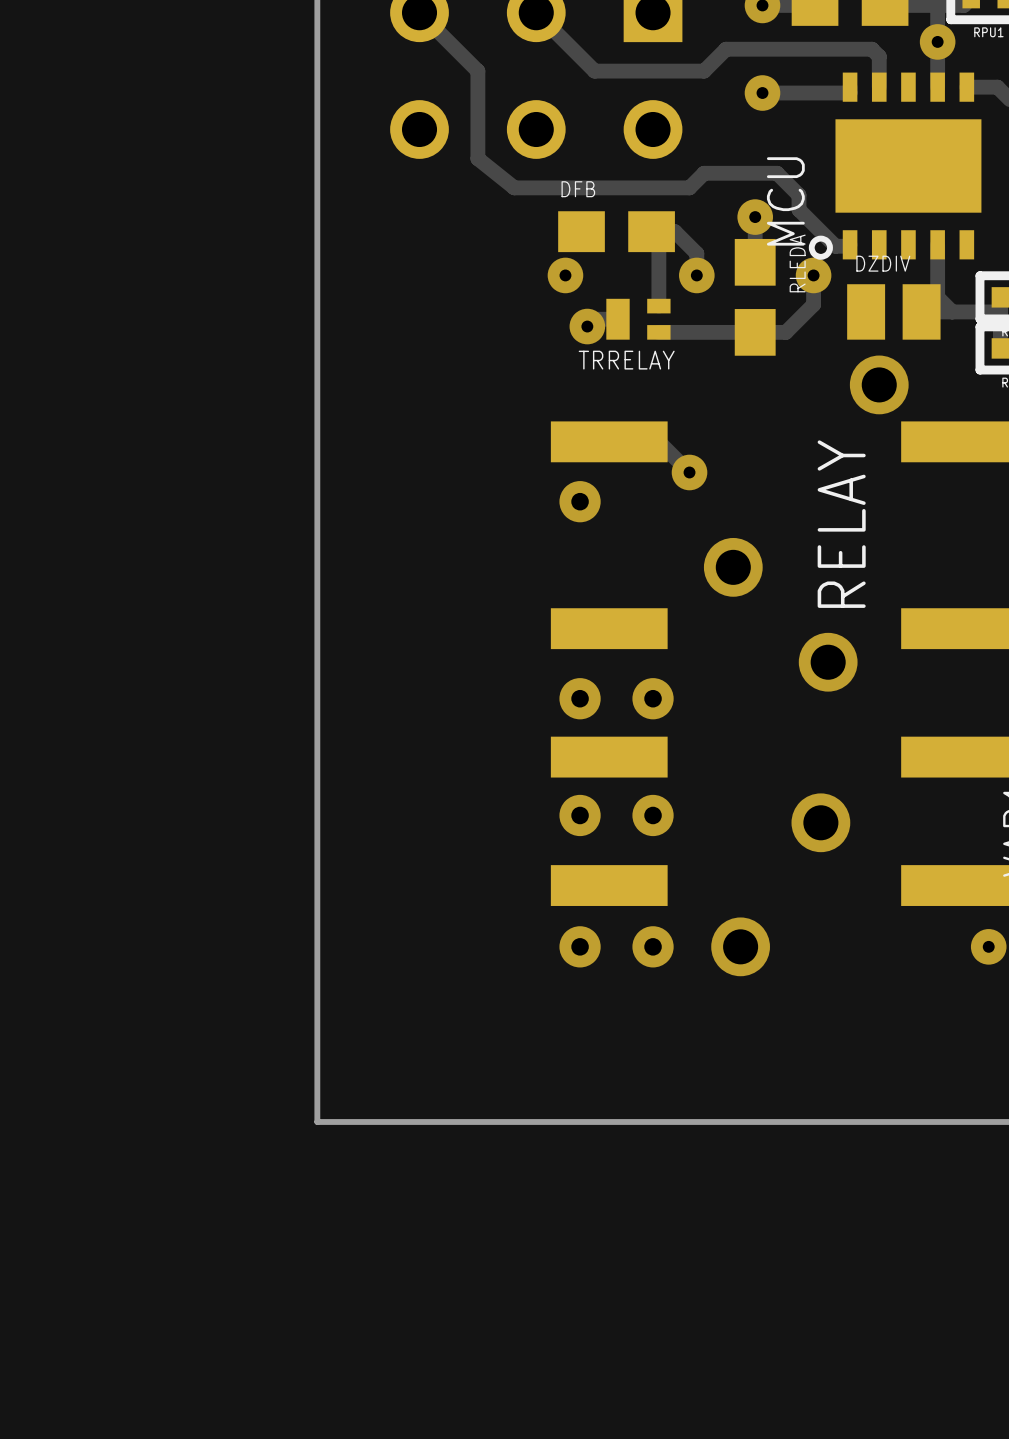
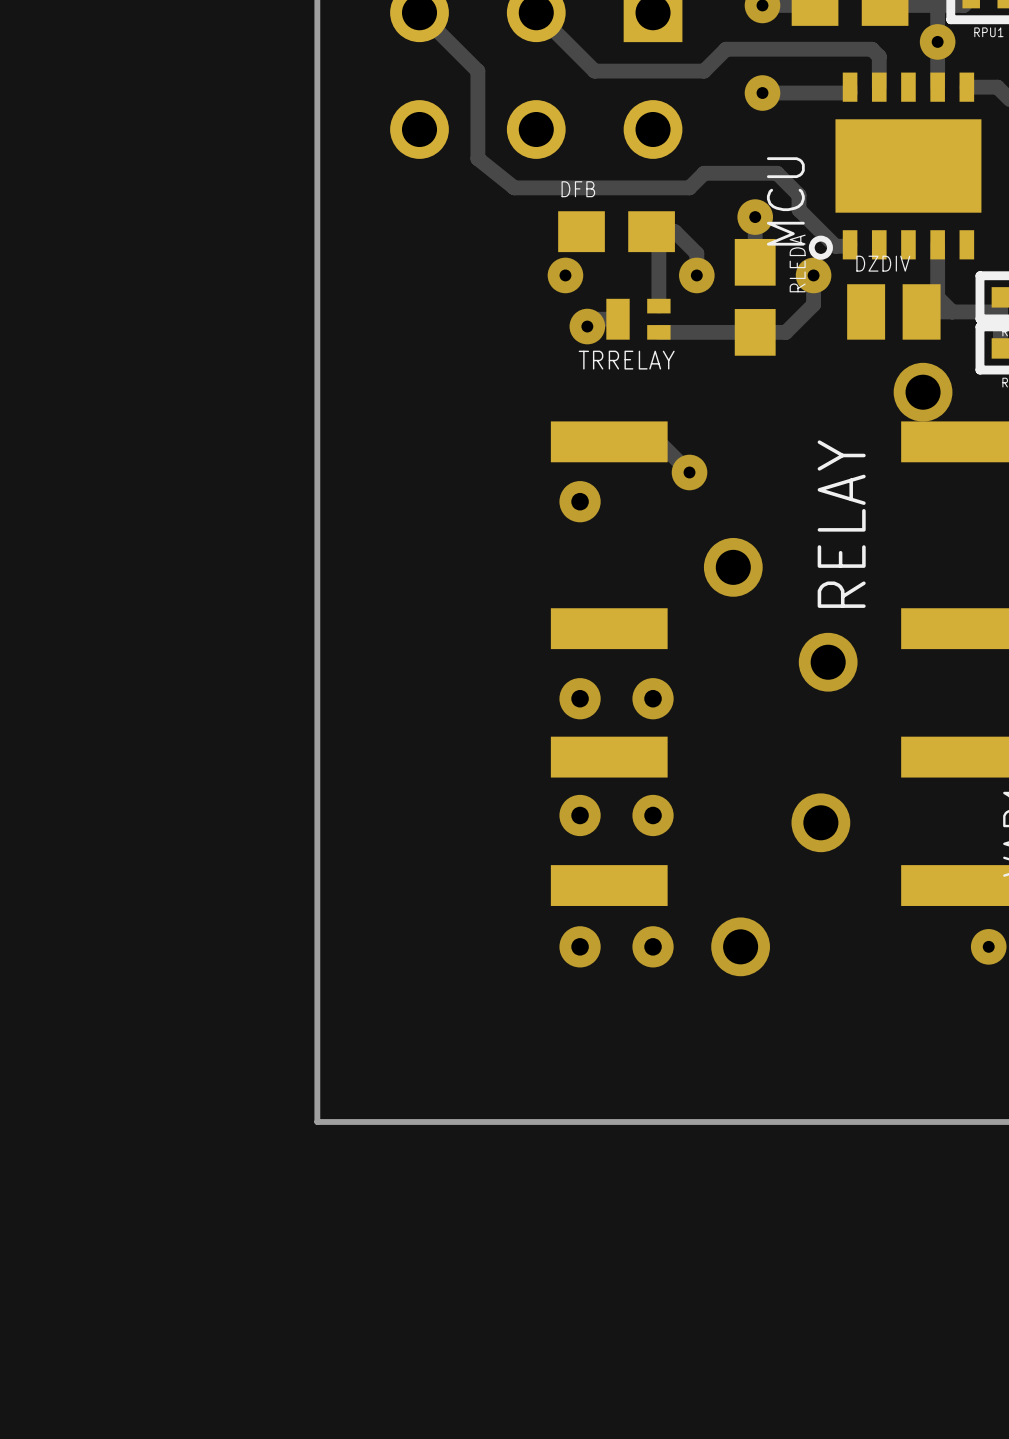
via position: (879, 384) -> (923, 392)

